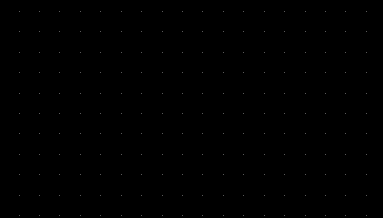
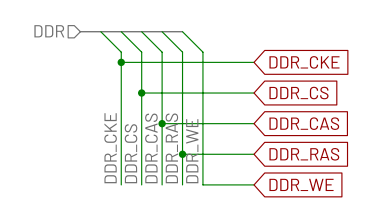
hierarchical label: none -> DDR (49, 31)
bus: none -> (80, 31) (182, 31)
wire: none -> (100, 31) (121, 52) (121, 184)
wire: none -> (121, 31) (141, 52) (141, 184)
wire: none -> (141, 31) (162, 52) (162, 184)
wire: none -> (162, 31) (182, 52) (182, 184)
wire: none -> (182, 31) (202, 52) (202, 184) (254, 184)
wire: none -> (121, 62) (254, 62)
junction: none -> (121, 62)
global label: none -> DDR_CKE (304, 62)
wire: none -> (141, 93) (254, 93)
junction: none -> (141, 93)
global label: none -> DDR_CS (298, 93)
wire: none -> (162, 123) (254, 123)
junction: none -> (162, 123)
global label: none -> DDR_CAS (304, 123)
label: none -> DDR_CKE (110, 148)
label: none -> DDR_CAS (151, 148)
label: none -> DDR_RAS (171, 148)
label: none -> DDR_CS (131, 153)
label: none -> DDR_WE (192, 151)
wire: none -> (182, 154) (254, 154)
junction: none -> (182, 154)
global label: none -> DDR_RAS (304, 154)
global label: none -> DDR_WE (301, 184)

